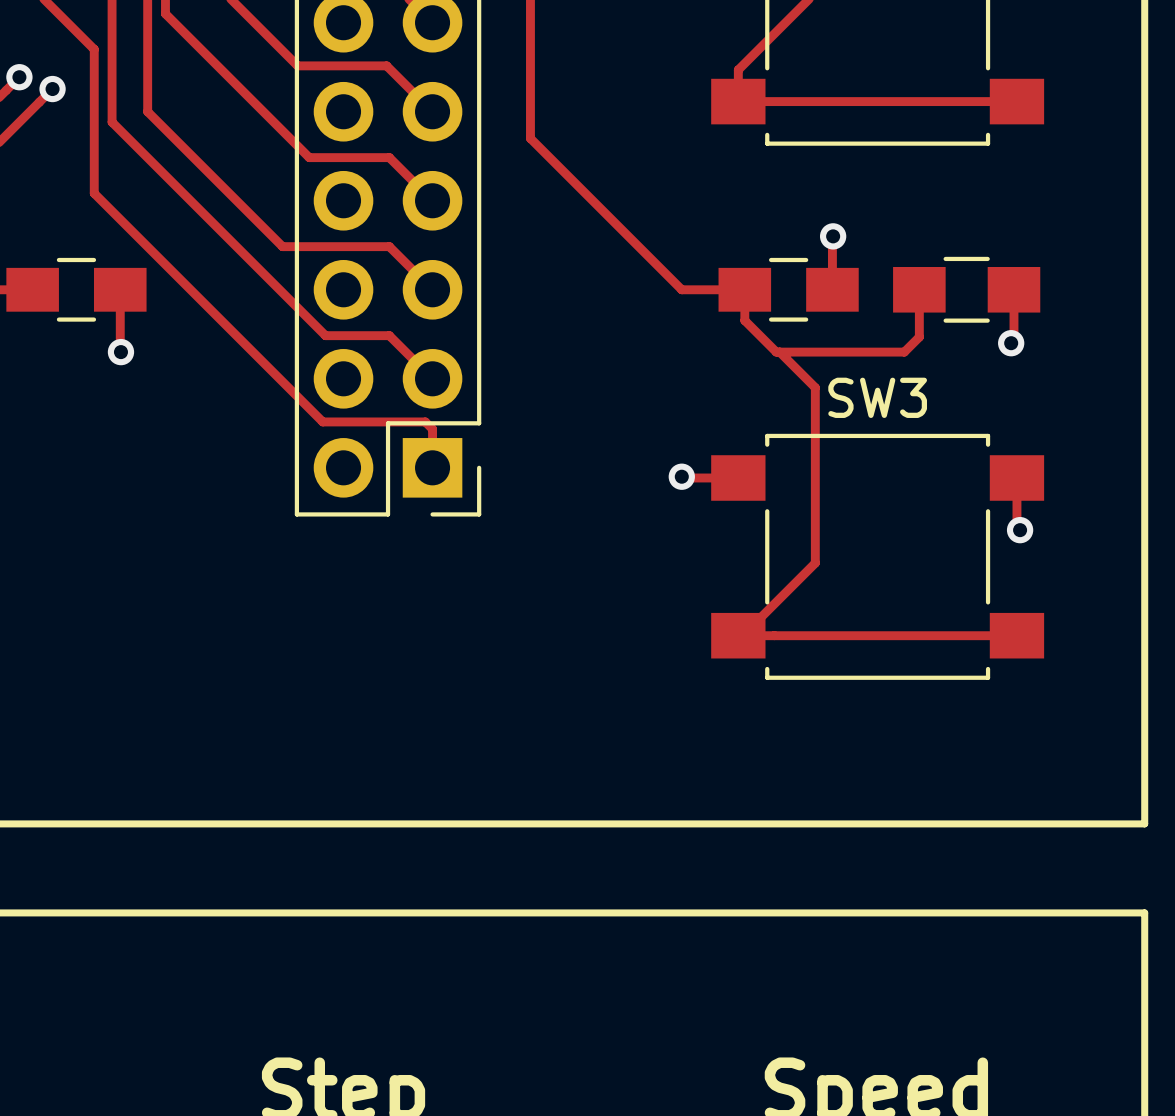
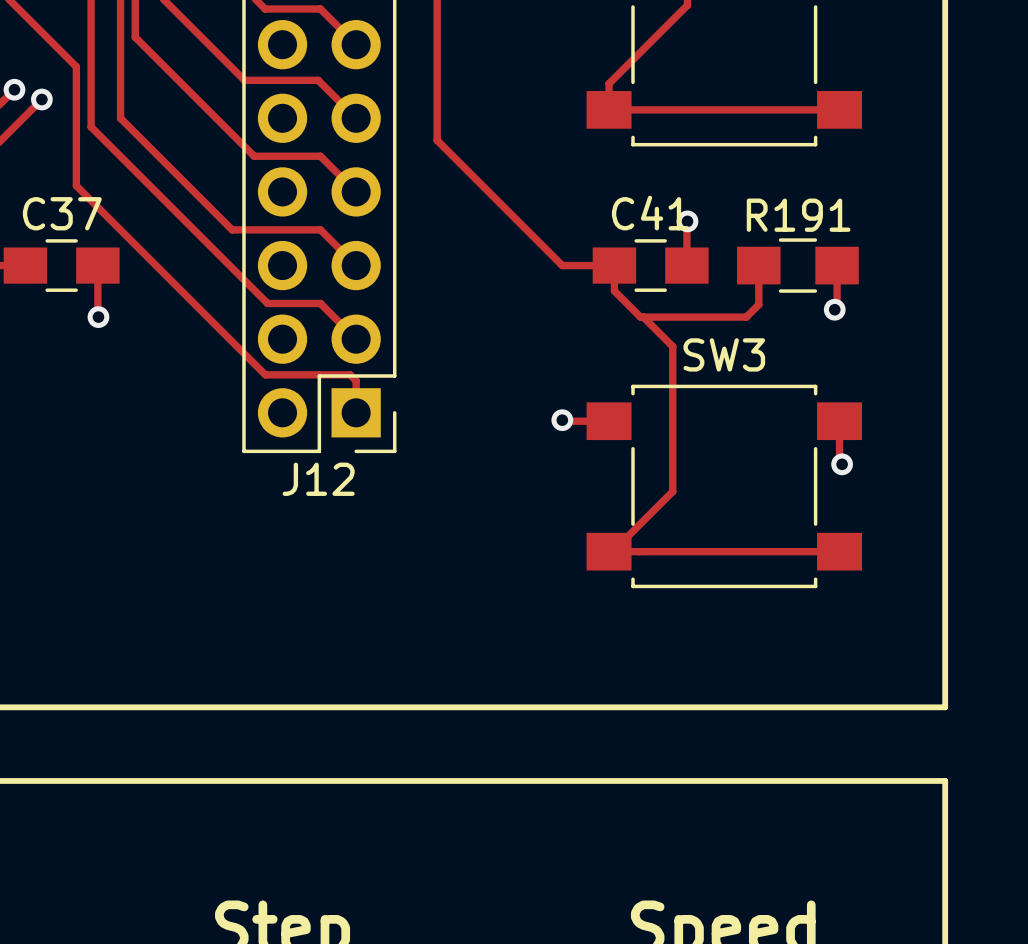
C41 name: none -> C41 (650, 213)
C37 name: none -> C37 (62, 213)
R191 name: none -> R191 (798, 215)
J12 name: none -> J12 (318, 479)

